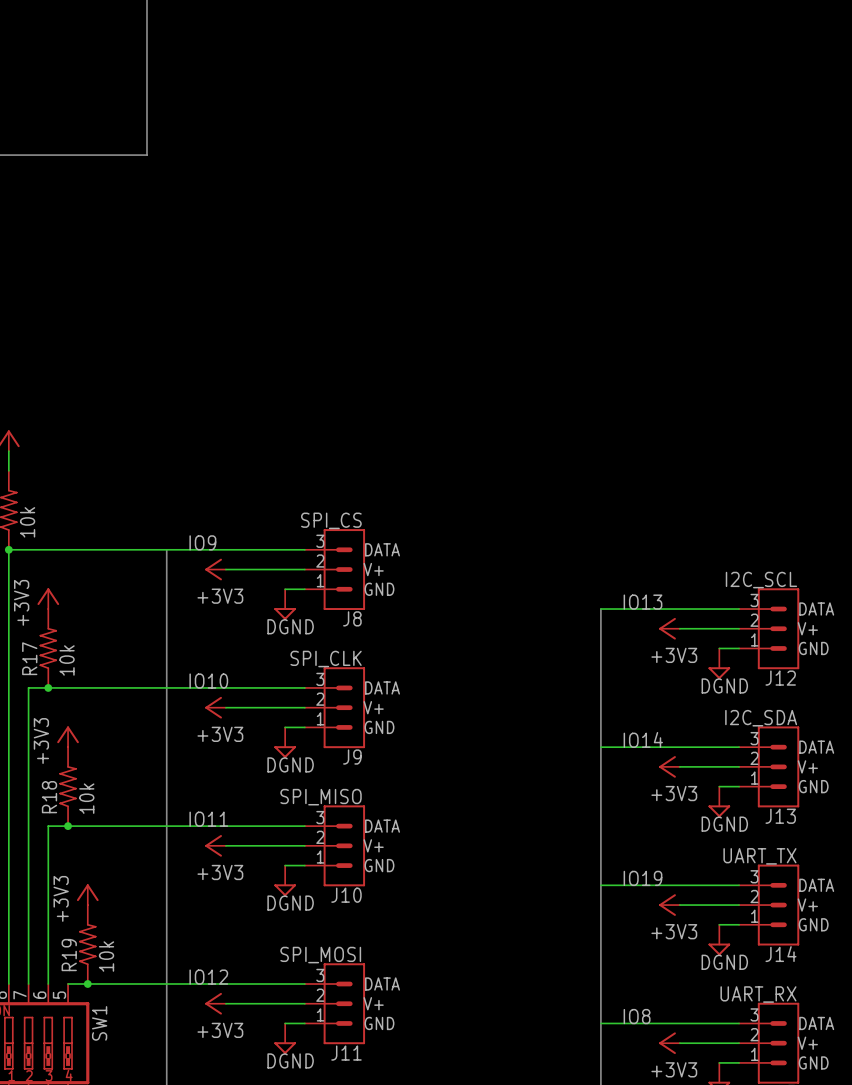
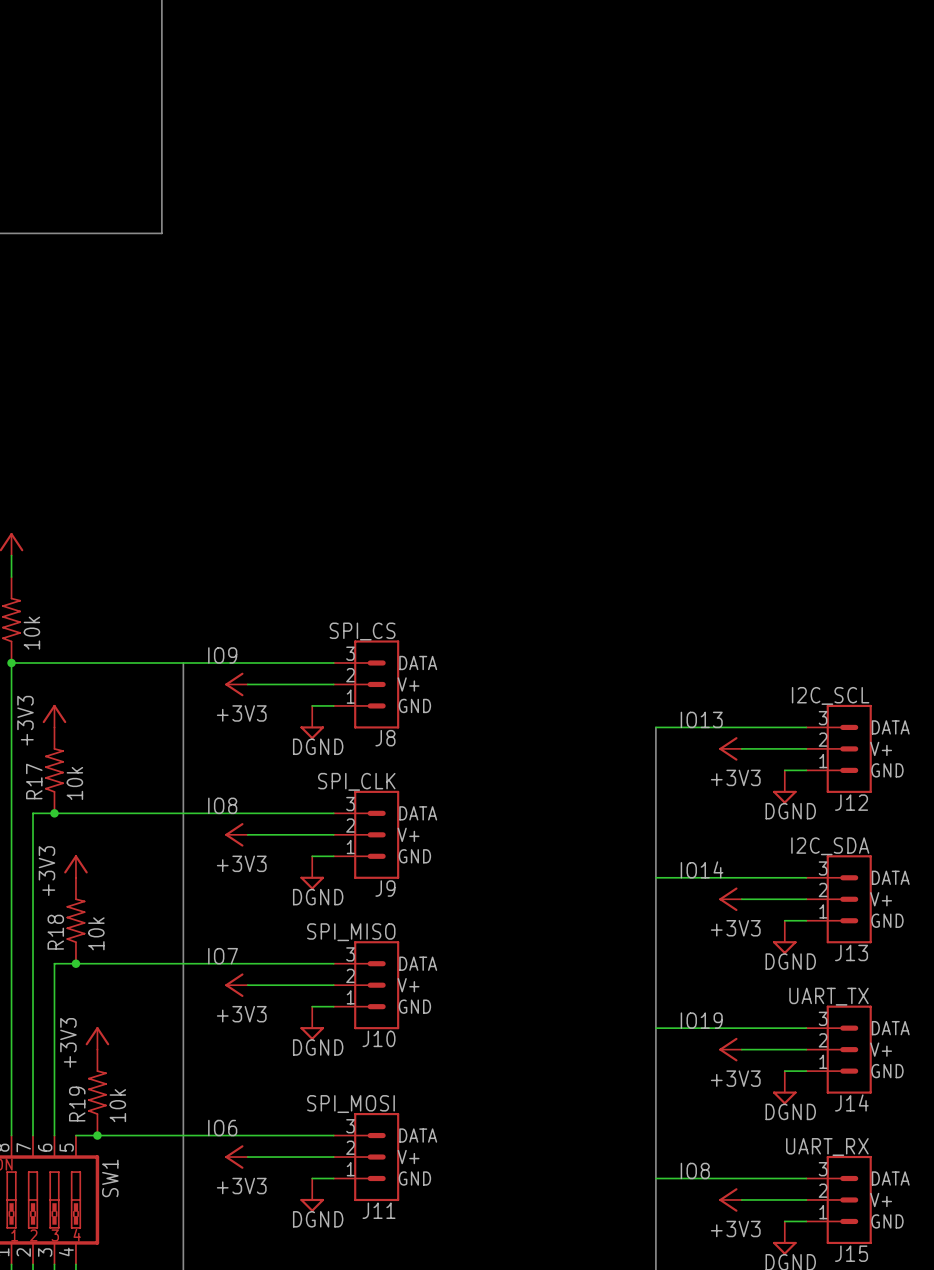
label: IO10 (208, 681) -> IO8 (222, 805)
label: IO11 (208, 819) -> IO7 (223, 956)
label: IO12 (208, 977) -> IO6 (222, 1128)

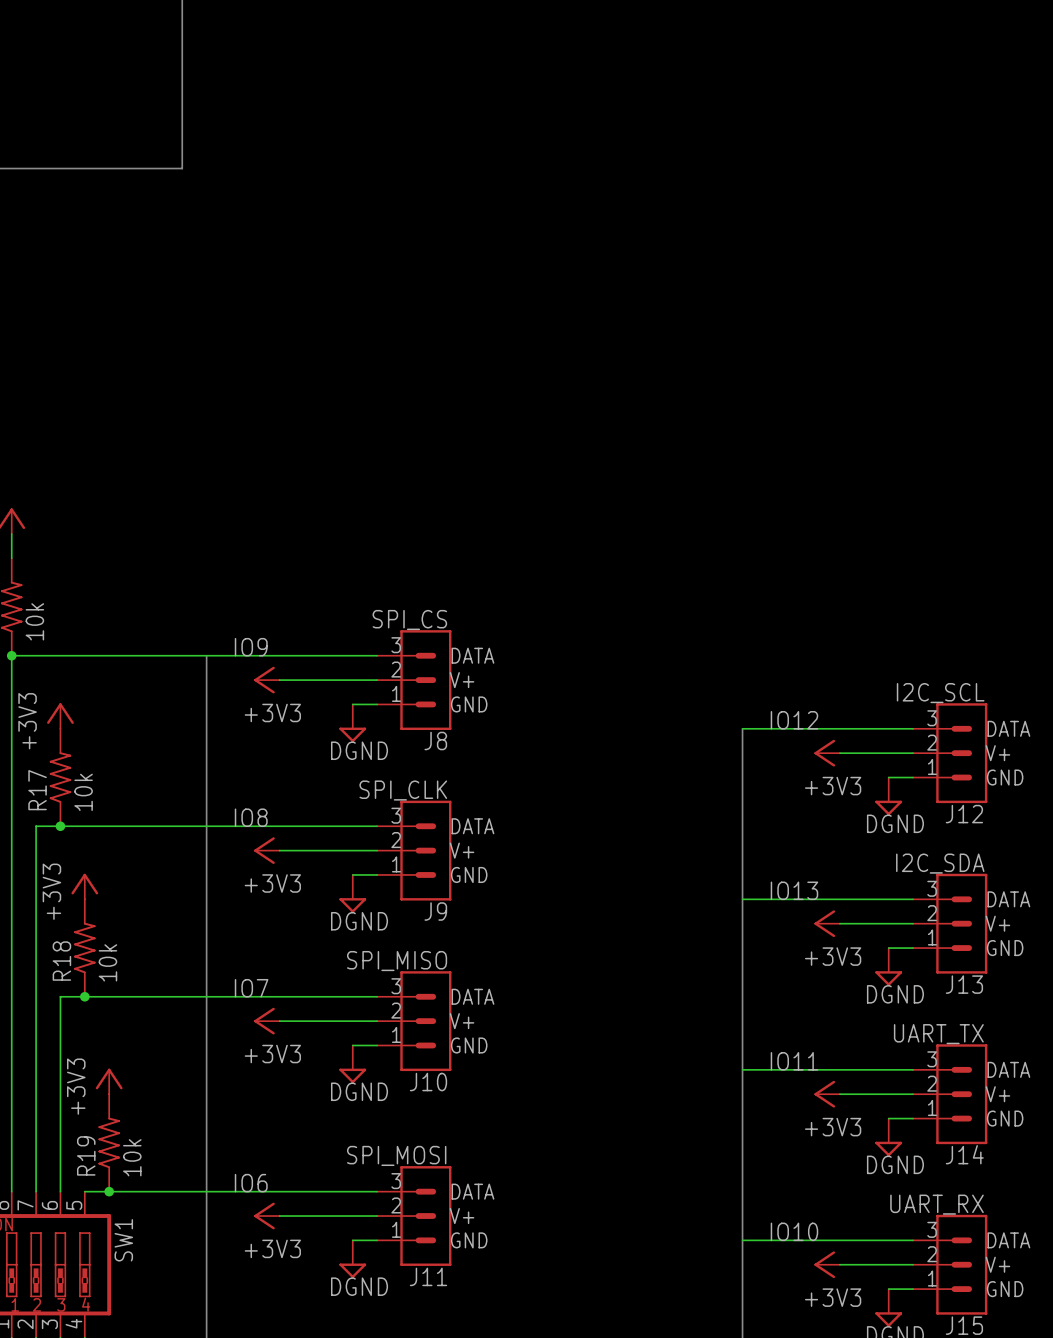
label: IO13 (701, 719) -> IO12 (794, 720)
label: IO14 (702, 869) -> IO13 (794, 890)
label: IO19 (701, 1020) -> IO11 (794, 1061)
label: IO8 (695, 1170) -> IO10 (794, 1231)

